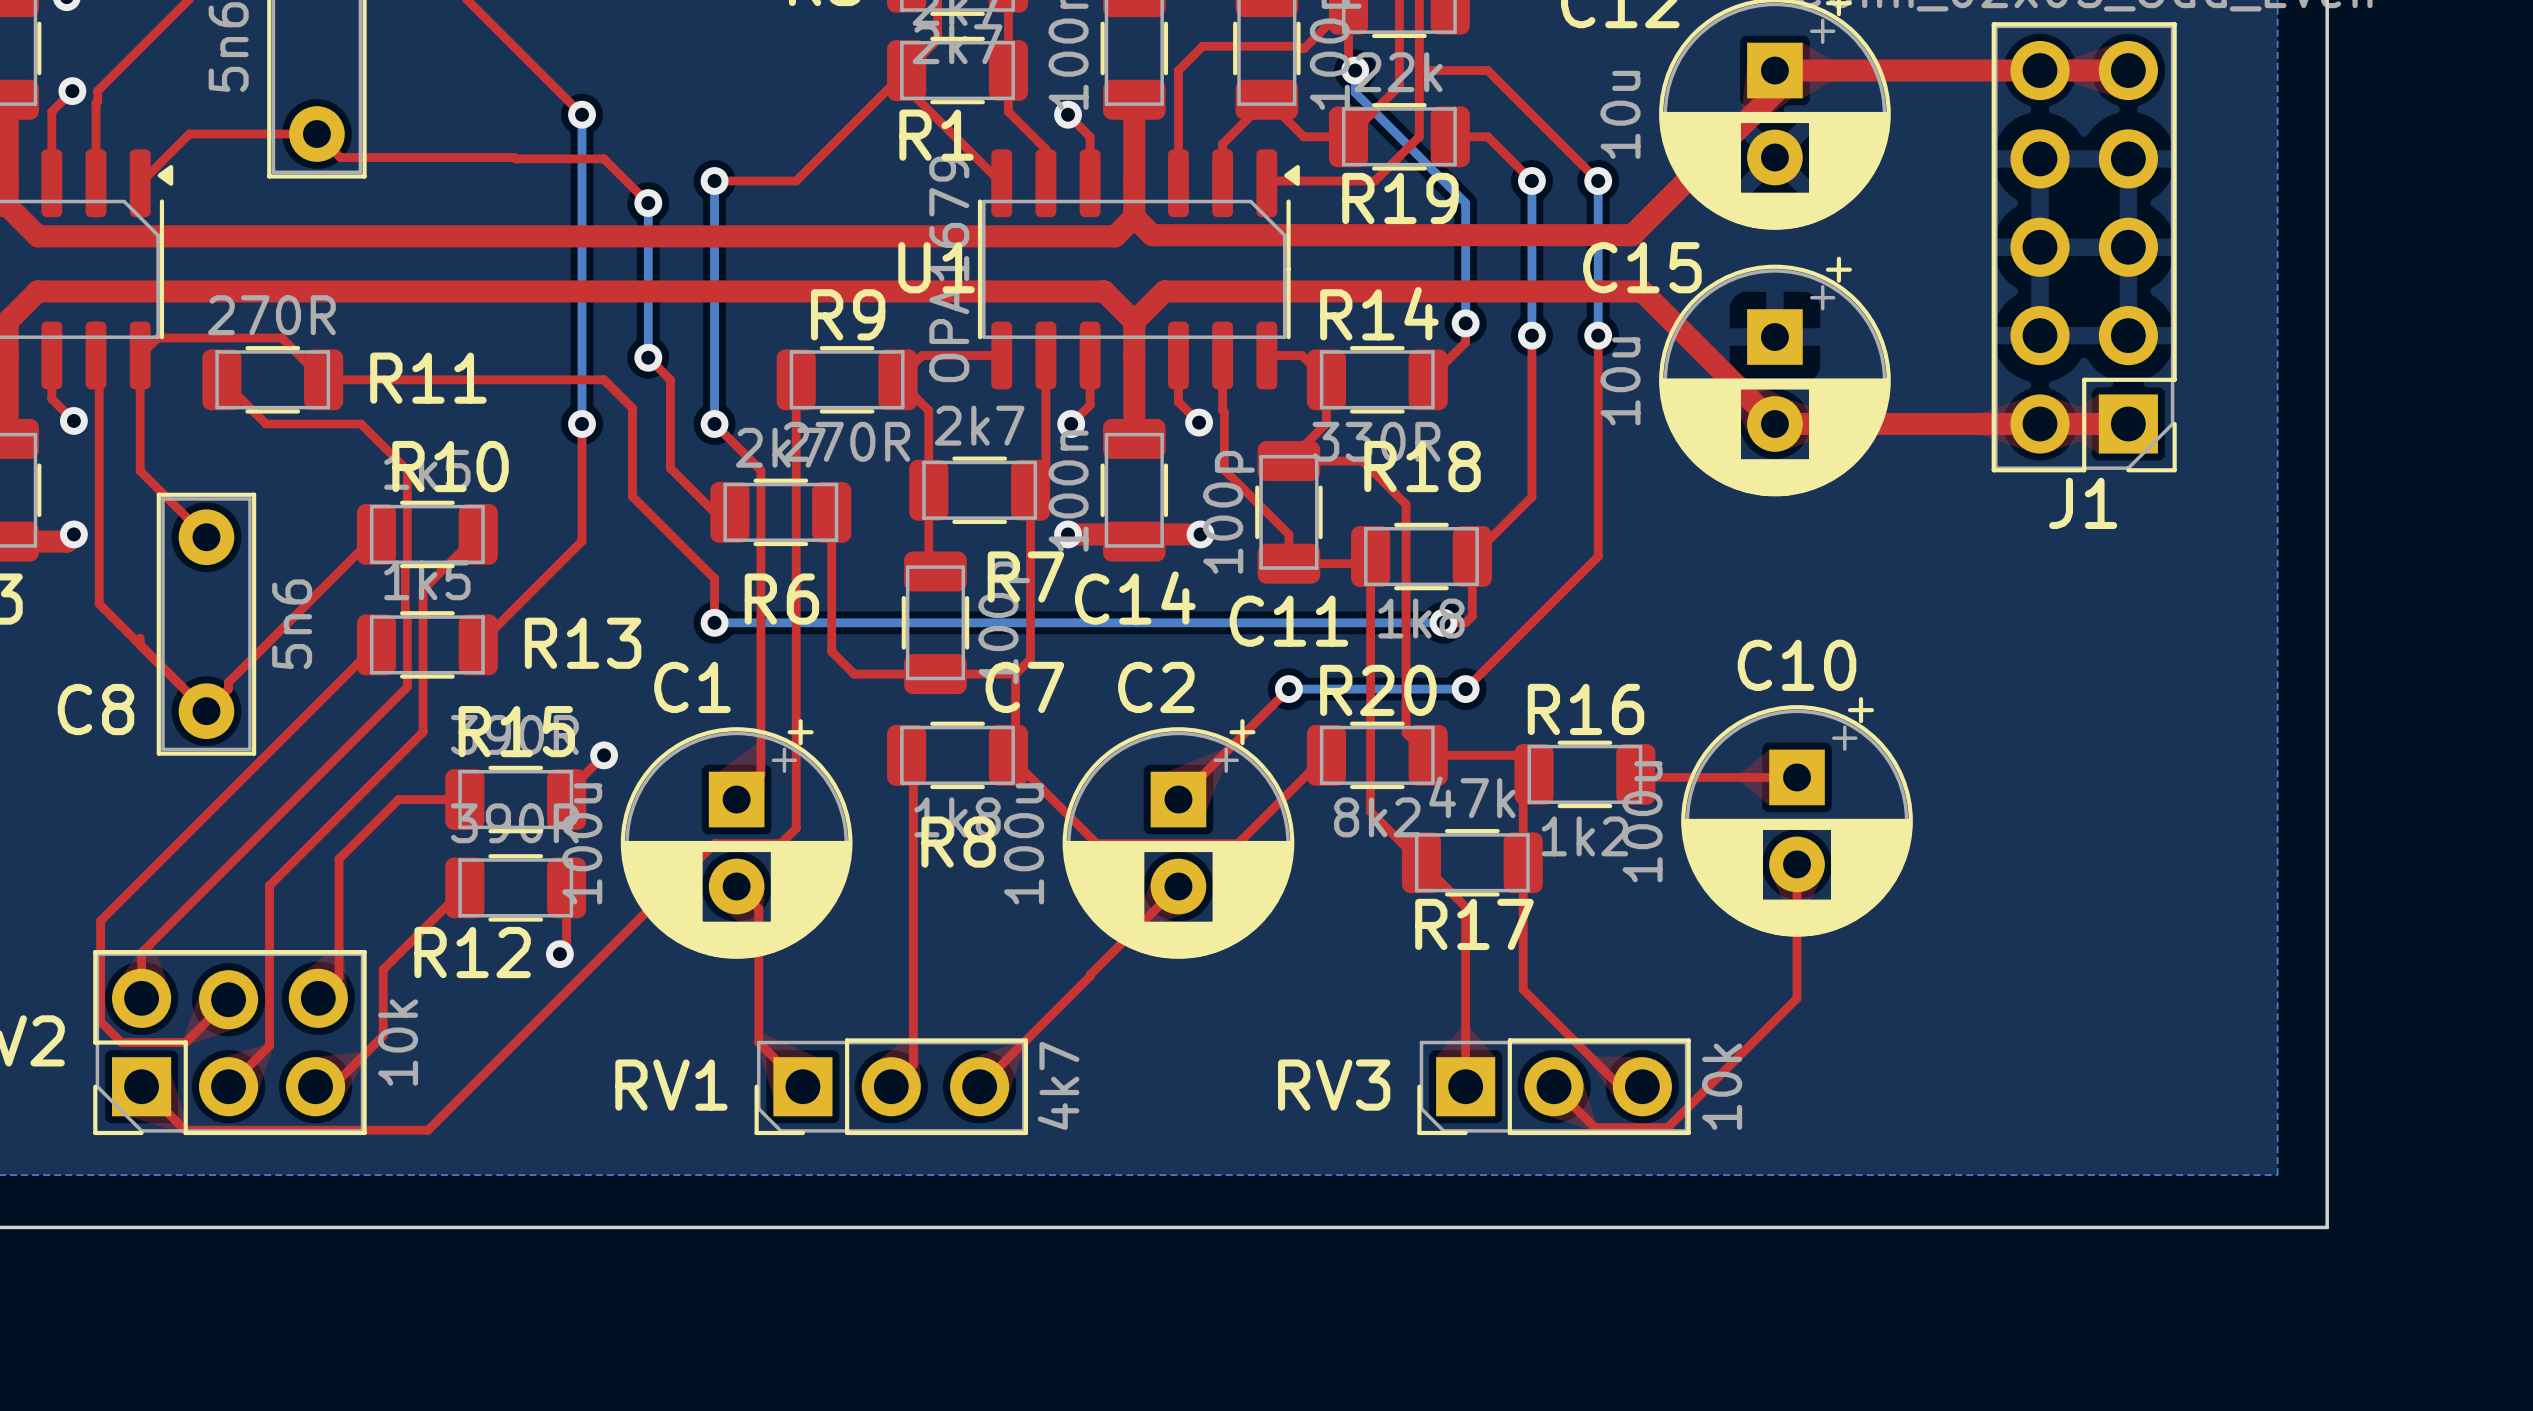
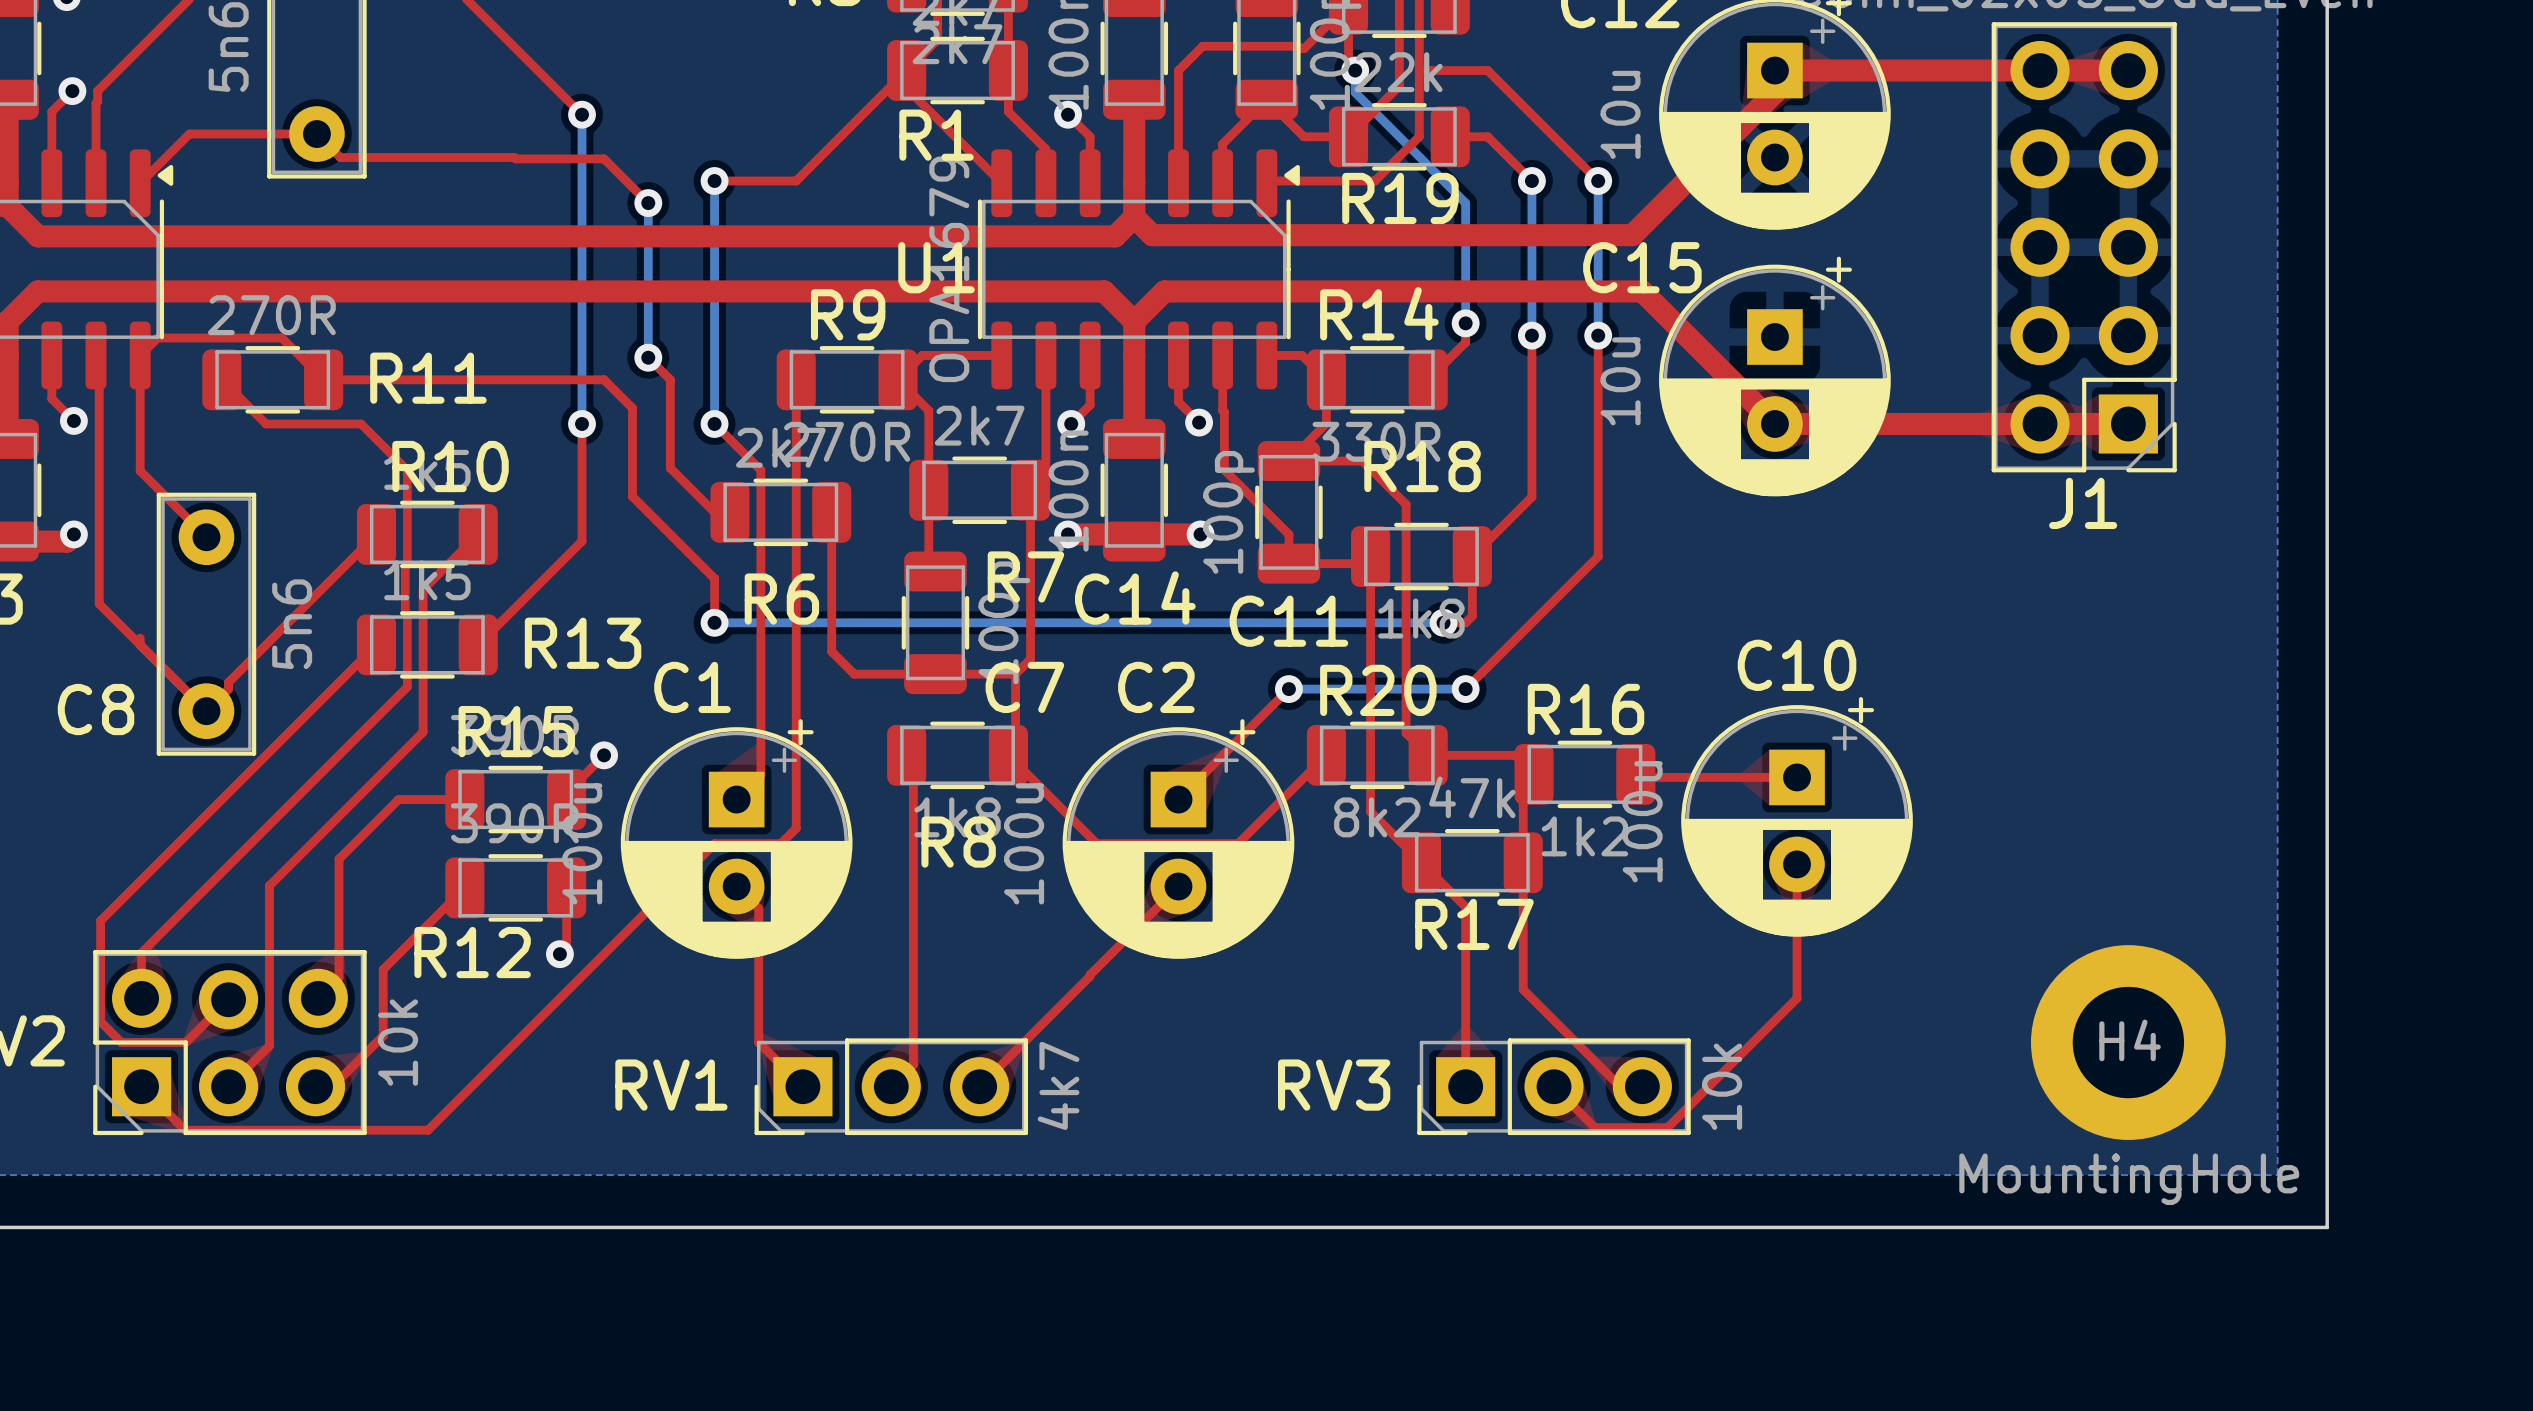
H4: none -> MountingHole (2128, 1042)

